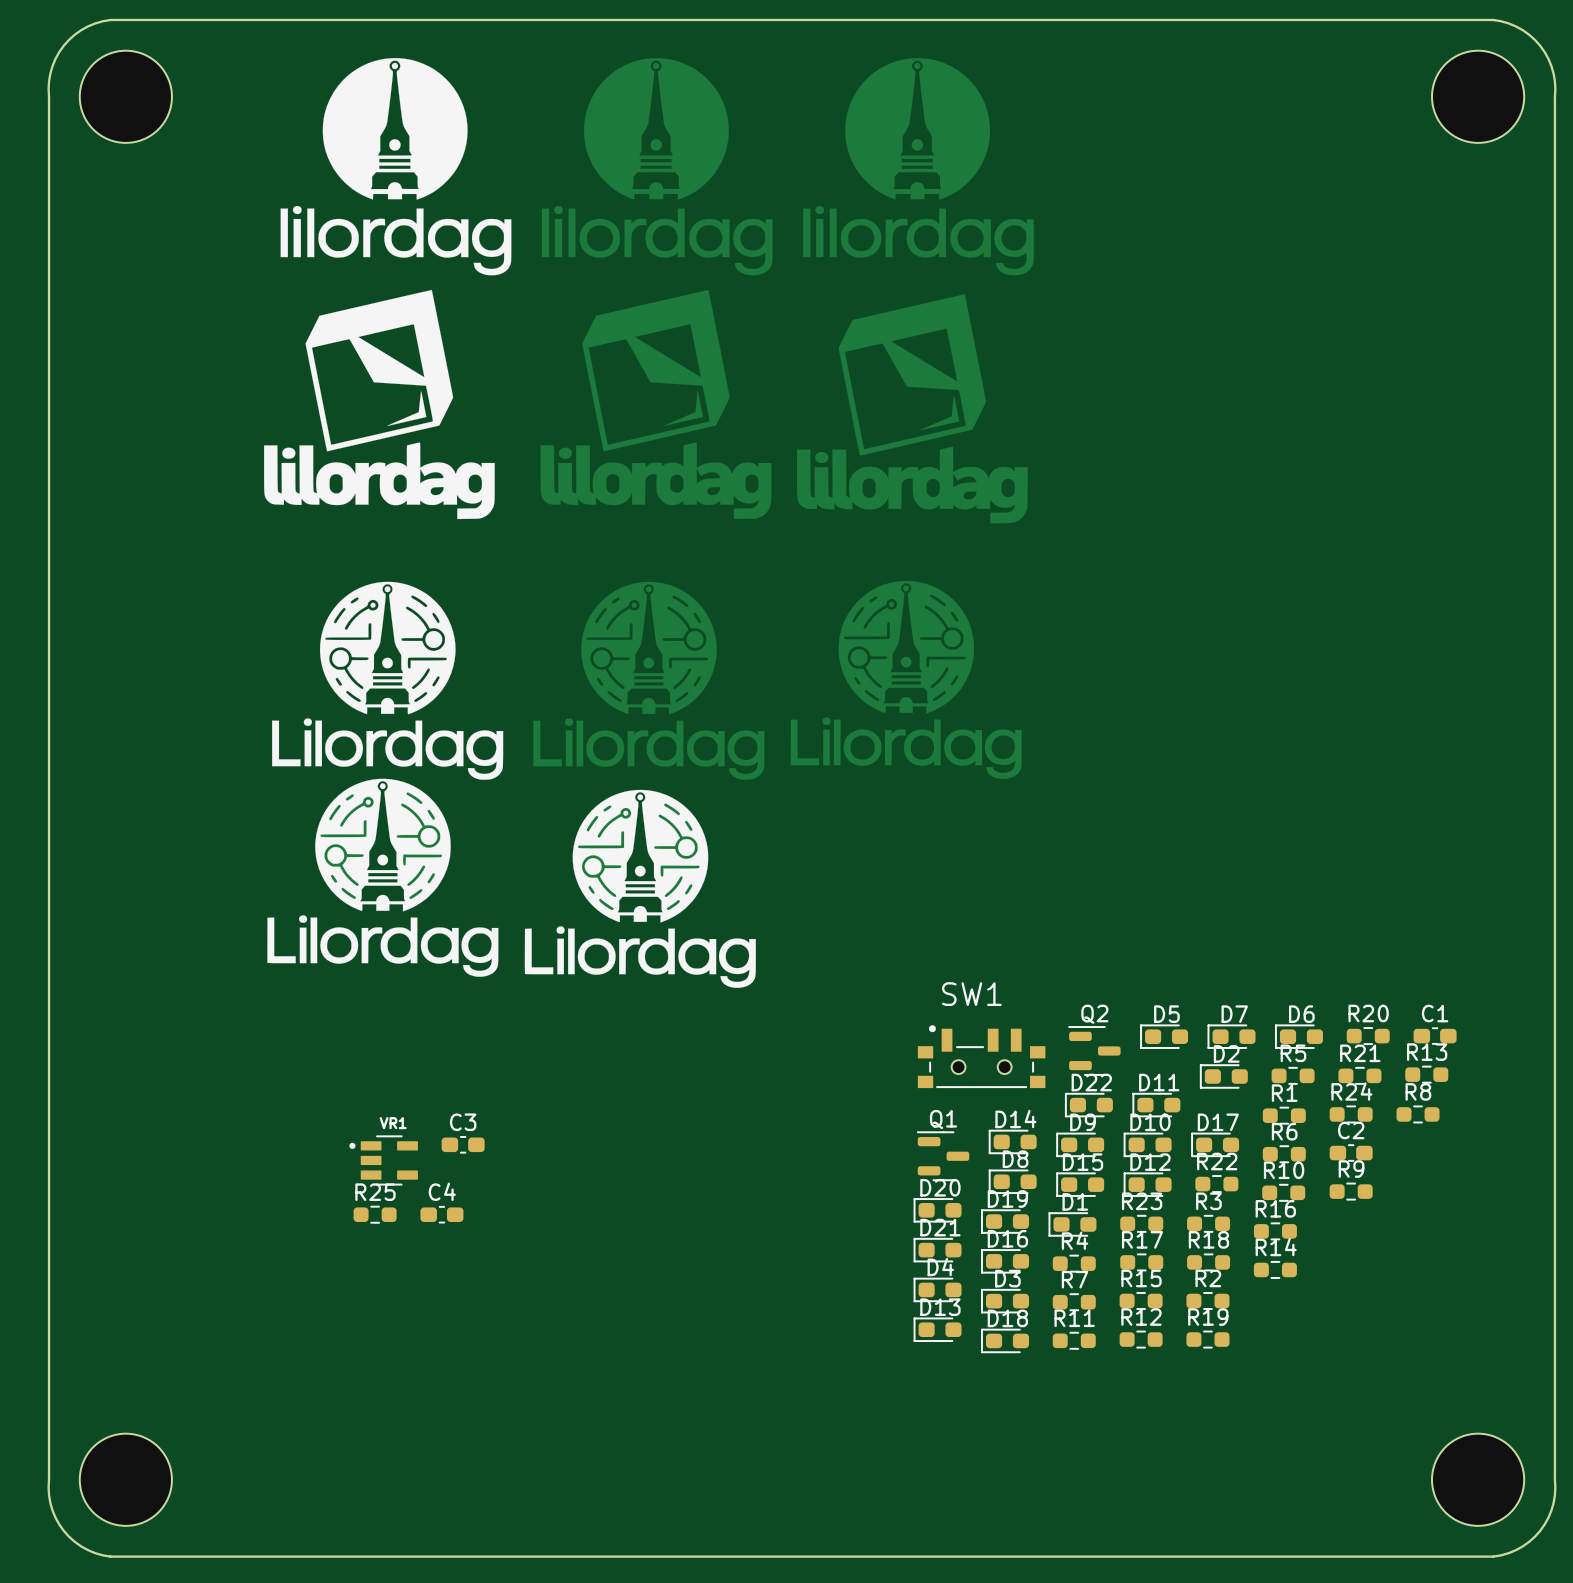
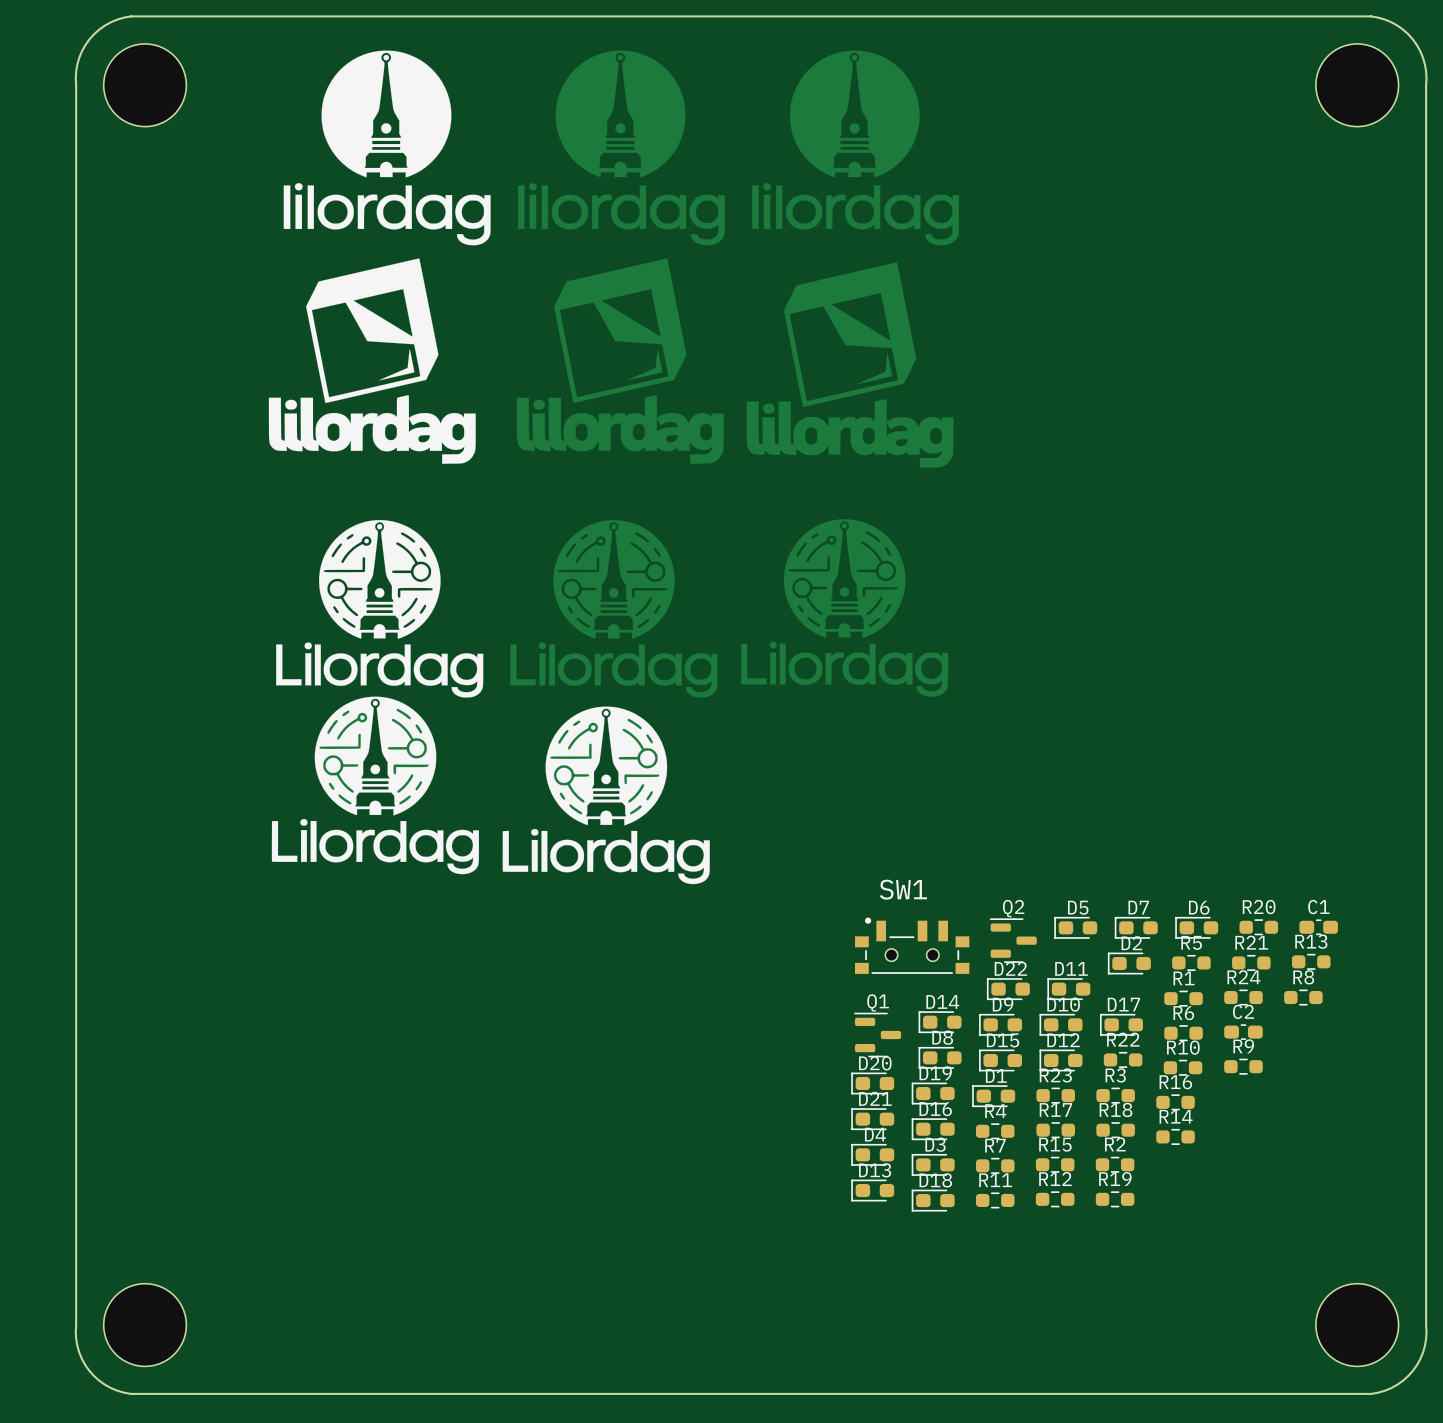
C3: (463, 1144) -> none
VR1: (383, 1160) -> none
R25: (375, 1214) -> none
C4: (441, 1214) -> none

